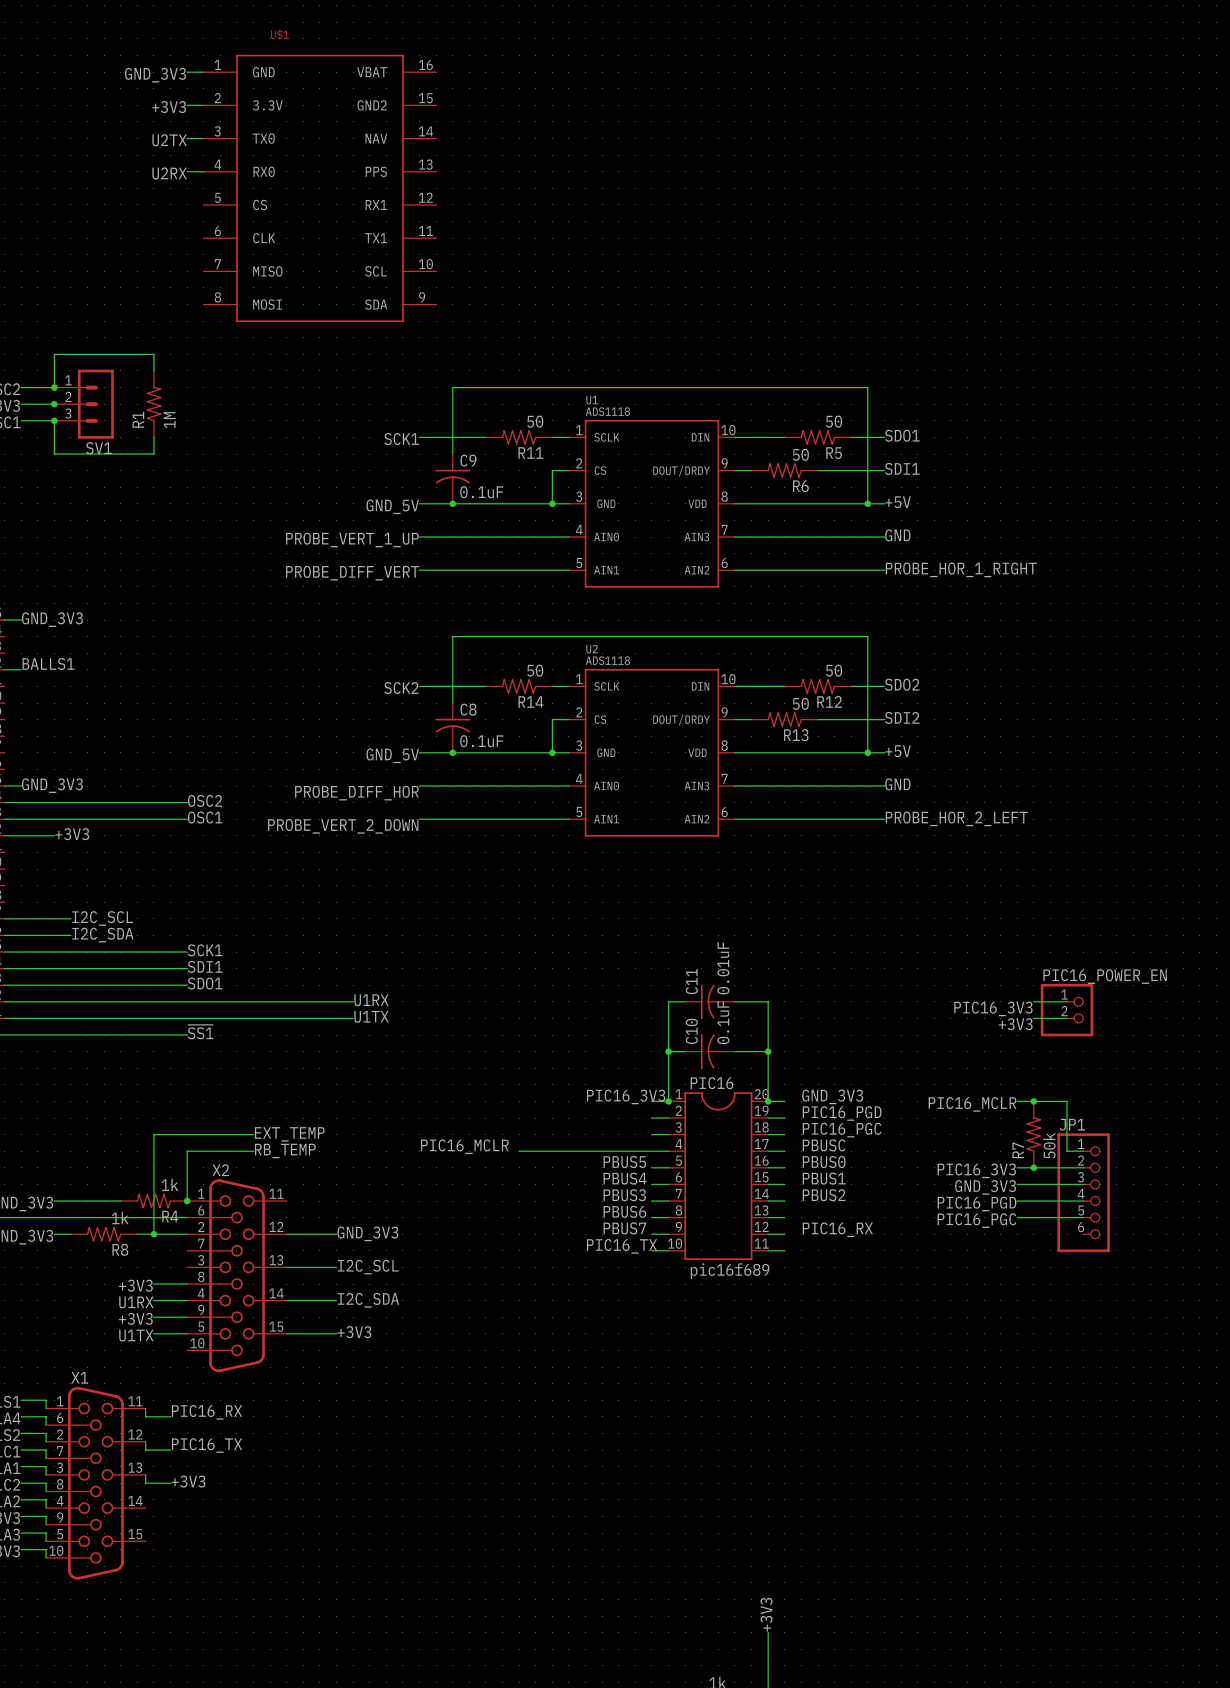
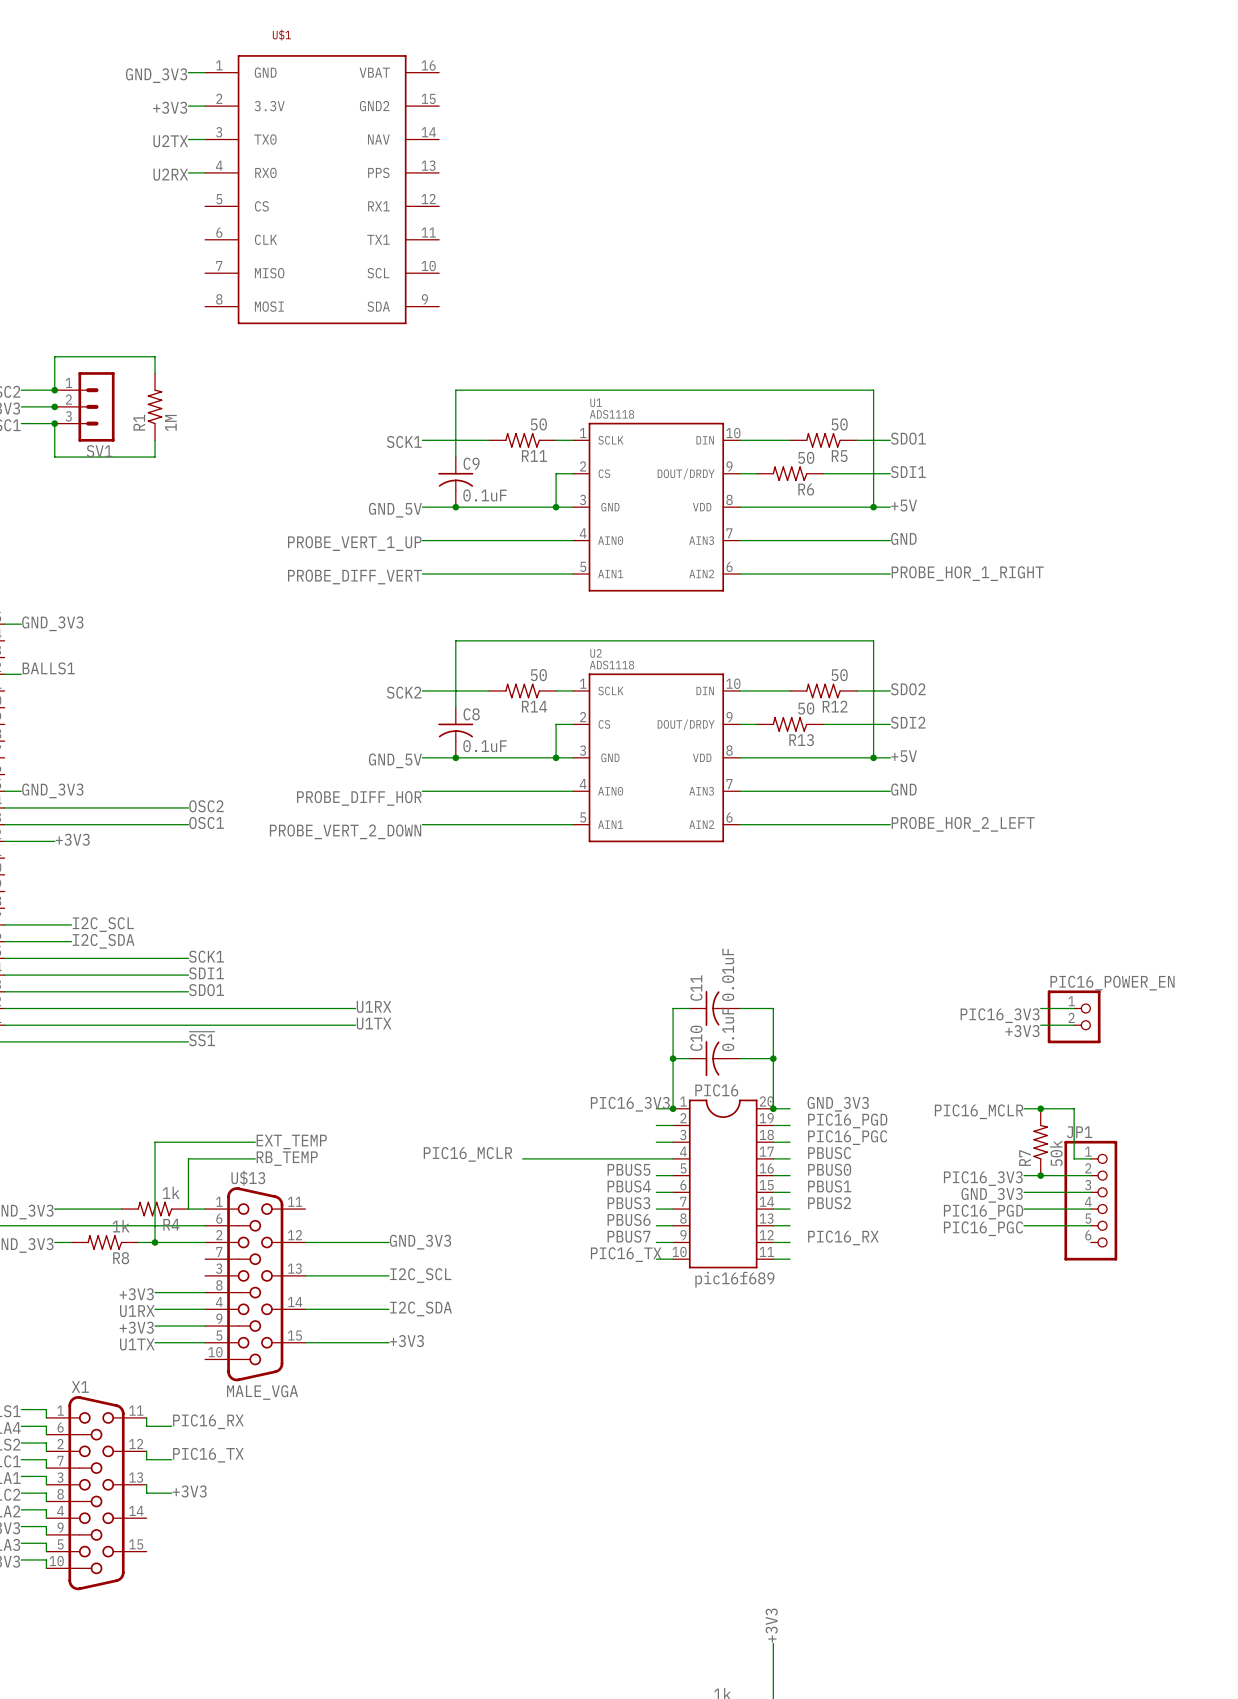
junction: (187, 1201) -> none
label position: GND_3V3 (367, 1233) -> GND_3V3 (420, 1242)
wire: none -> (338, 1242) (388, 1242)
wire: none -> (338, 1275) (388, 1275)
label position: I2C_SCL (368, 1267) -> I2C_SCL (420, 1275)
X2: (236, 1275) -> none
U$13: none -> MALE_VGA (255, 1284)
wire: none -> (338, 1309) (388, 1309)
label position: I2C_SDA (368, 1300) -> I2C_SDA (421, 1308)
label position: +3V3 (354, 1332) -> +3V3 (406, 1341)
wire: none -> (338, 1342) (388, 1342)

